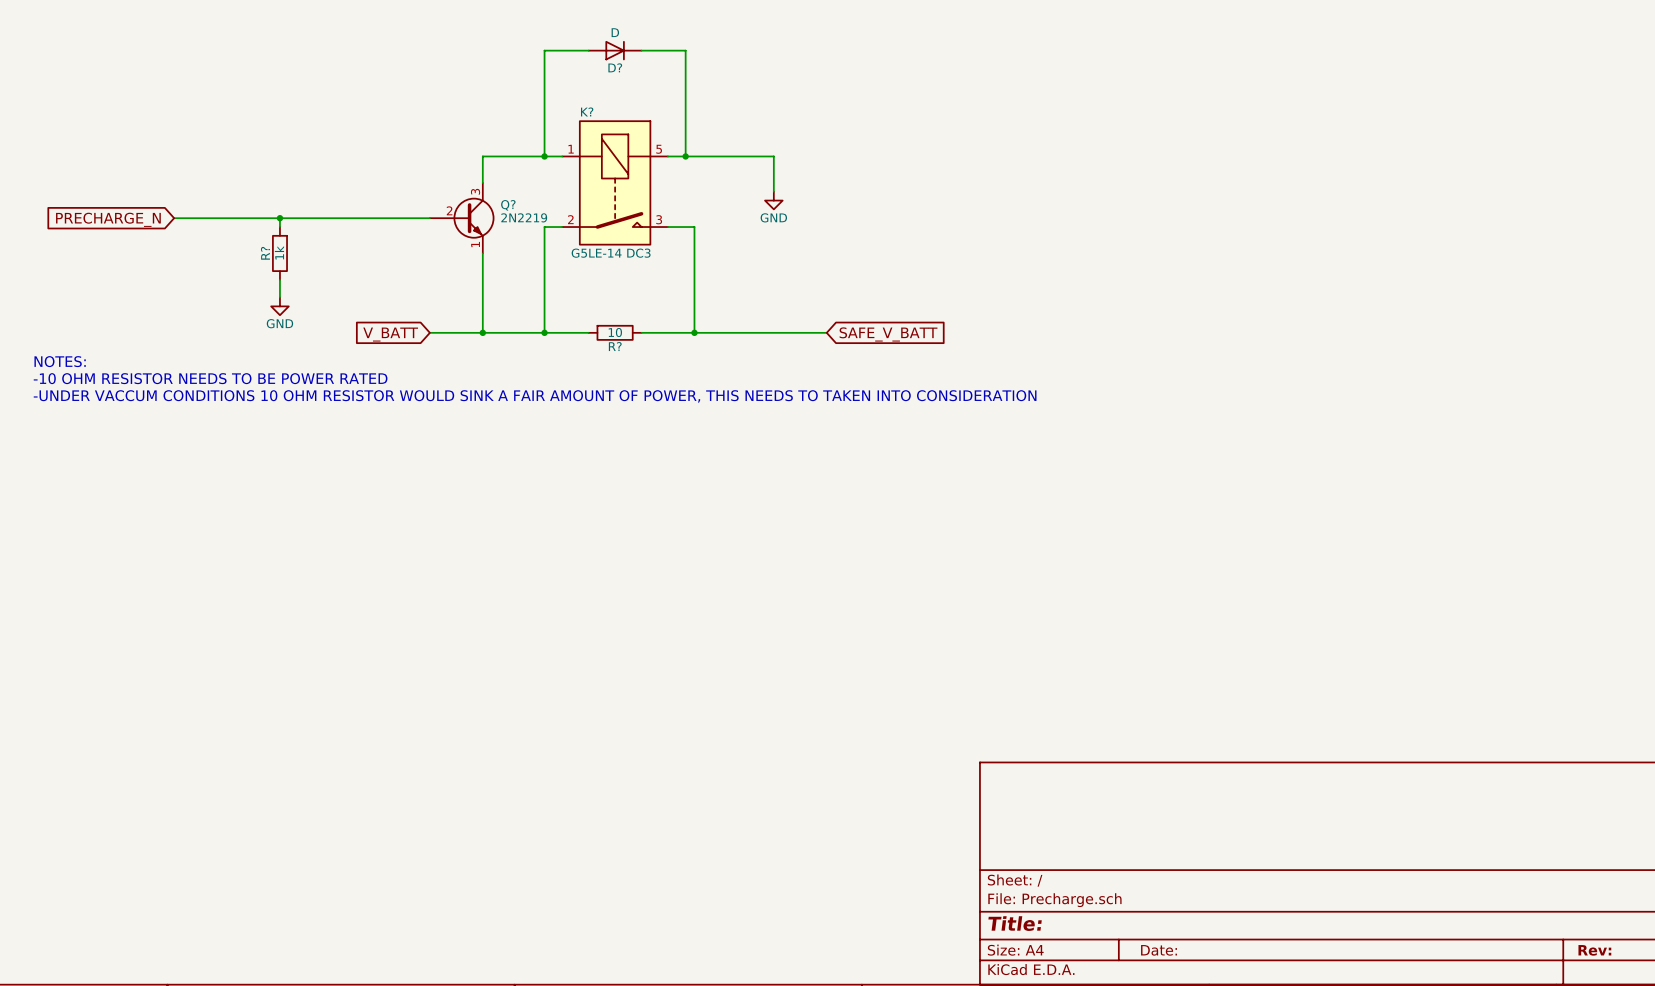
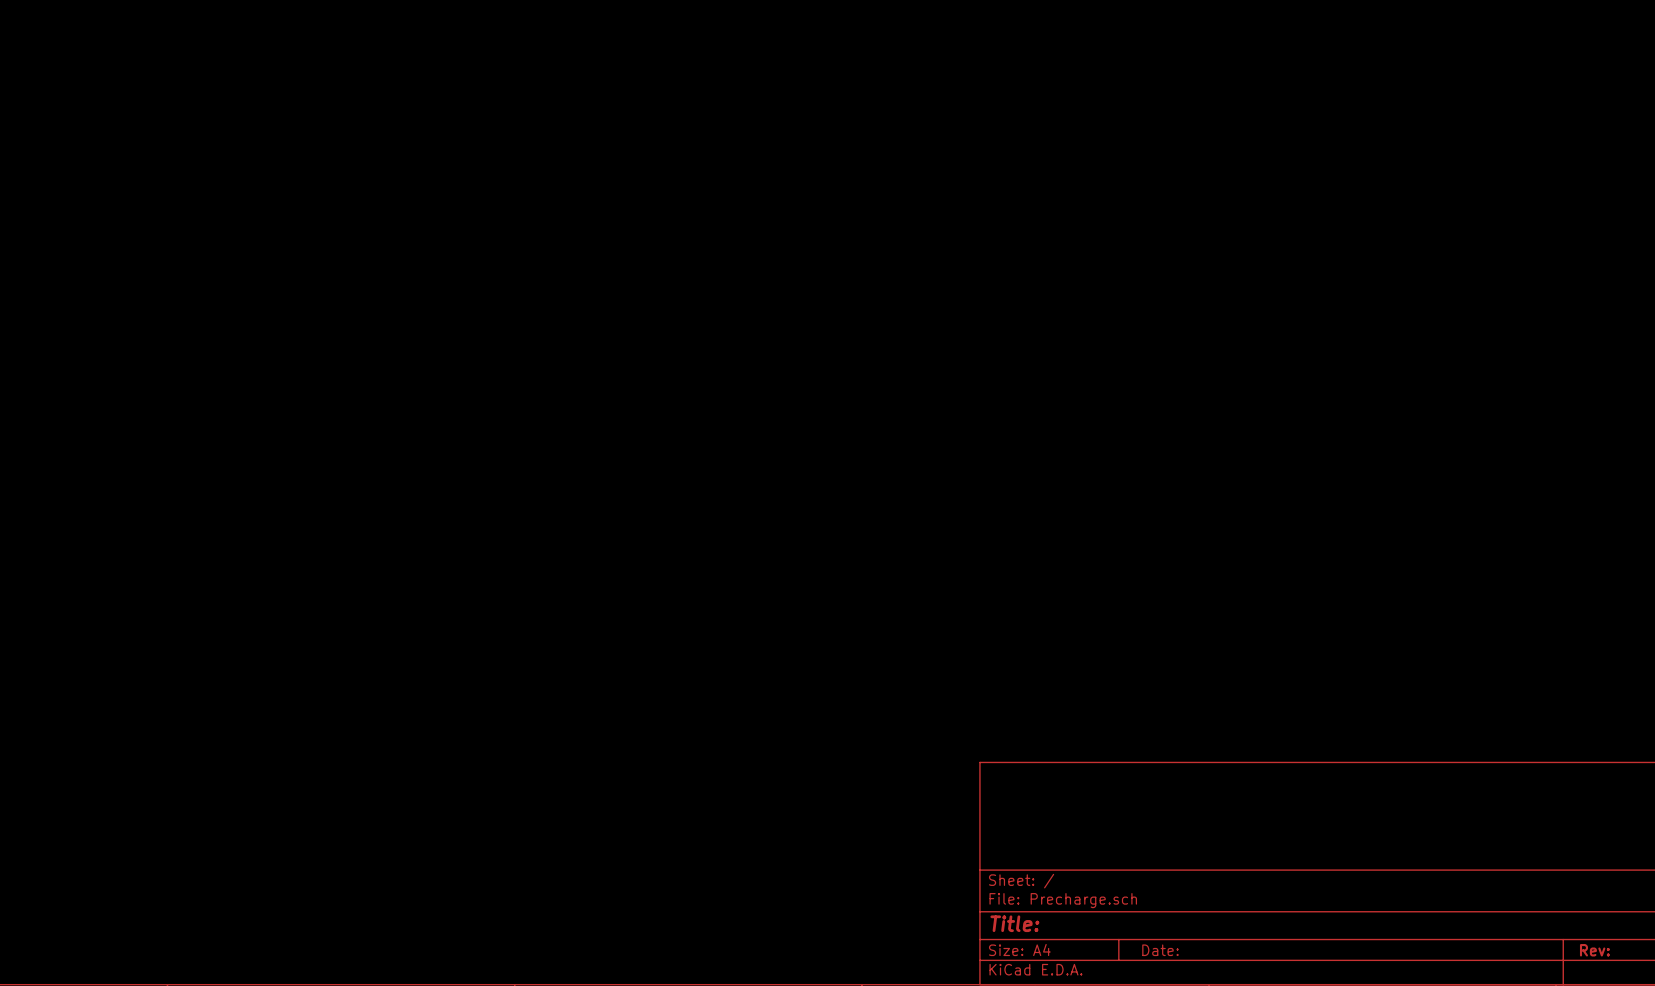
wire: (588, 50) (544, 50) (544, 156) -> none
D?: D (615, 50) -> none
wire: (641, 50) (685, 50) (685, 156) -> none
junction: (544, 156) -> none
wire: (562, 156) (482, 156) (482, 182) -> none
wire: (668, 156) (773, 156) (773, 191) -> none
junction: (685, 156) -> none
K?: G5LE-14 DC3 (615, 182) -> none
power symbol: GND (773, 200) -> none
wire: (174, 218) (429, 218) -> none
wire: (279, 218) (279, 227) -> none
junction: (279, 218) -> none
Q?: 2N2219 (462, 218) -> none
global label: PRECHARGE_N (108, 219) -> none
wire: (562, 227) (544, 227) (544, 332) -> none
wire: (668, 227) (694, 227) (694, 332) -> none
R?: 1k (279, 253) -> none
wire: (482, 253) (482, 332) -> none
wire: (279, 279) (279, 297) -> none
power symbol: GND (279, 306) -> none
wire: (429, 332) (588, 332) -> none
junction: (482, 332) -> none
junction: (544, 332) -> none
R?: 10 (615, 332) -> none
wire: (641, 332) (826, 332) -> none
junction: (694, 332) -> none
global label: V_BATT (390, 334) -> none
global label: SAFE_V_BATT (888, 334) -> none
text: NOTES: (60, 361) -> none
text: -10 OHM RESISTOR NEEDS TO BE POWER RATED (210, 378) -> none
text: -UNDER VACCUM CONDITIONS 10 OHM RESISTOR WOULD SINK A FAIR AMOUNT OF POWER, THIS NEEDS TO TAKEN INTO CONSIDERATION (535, 396) -> none

